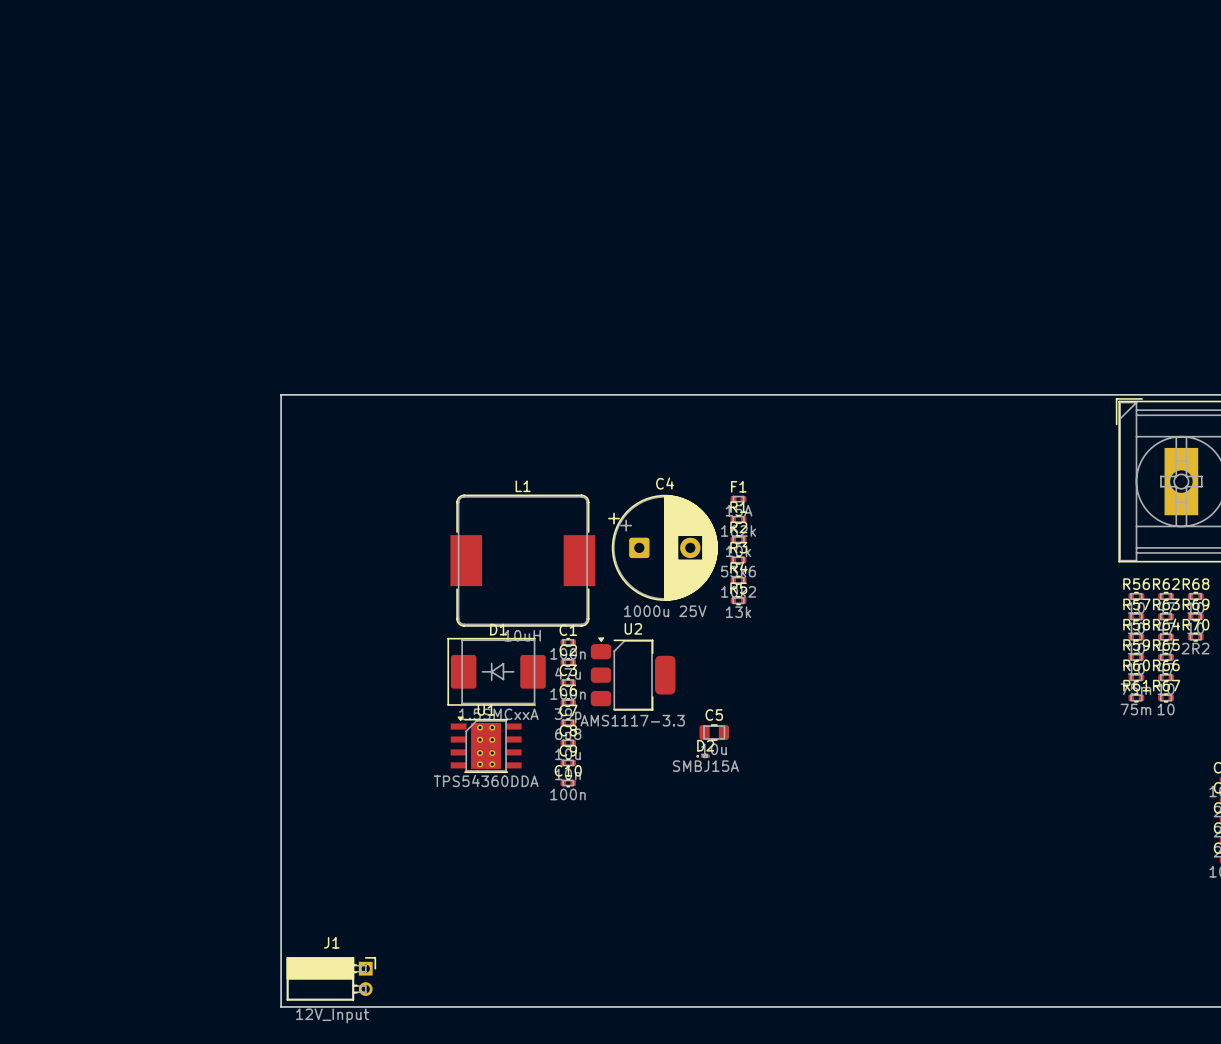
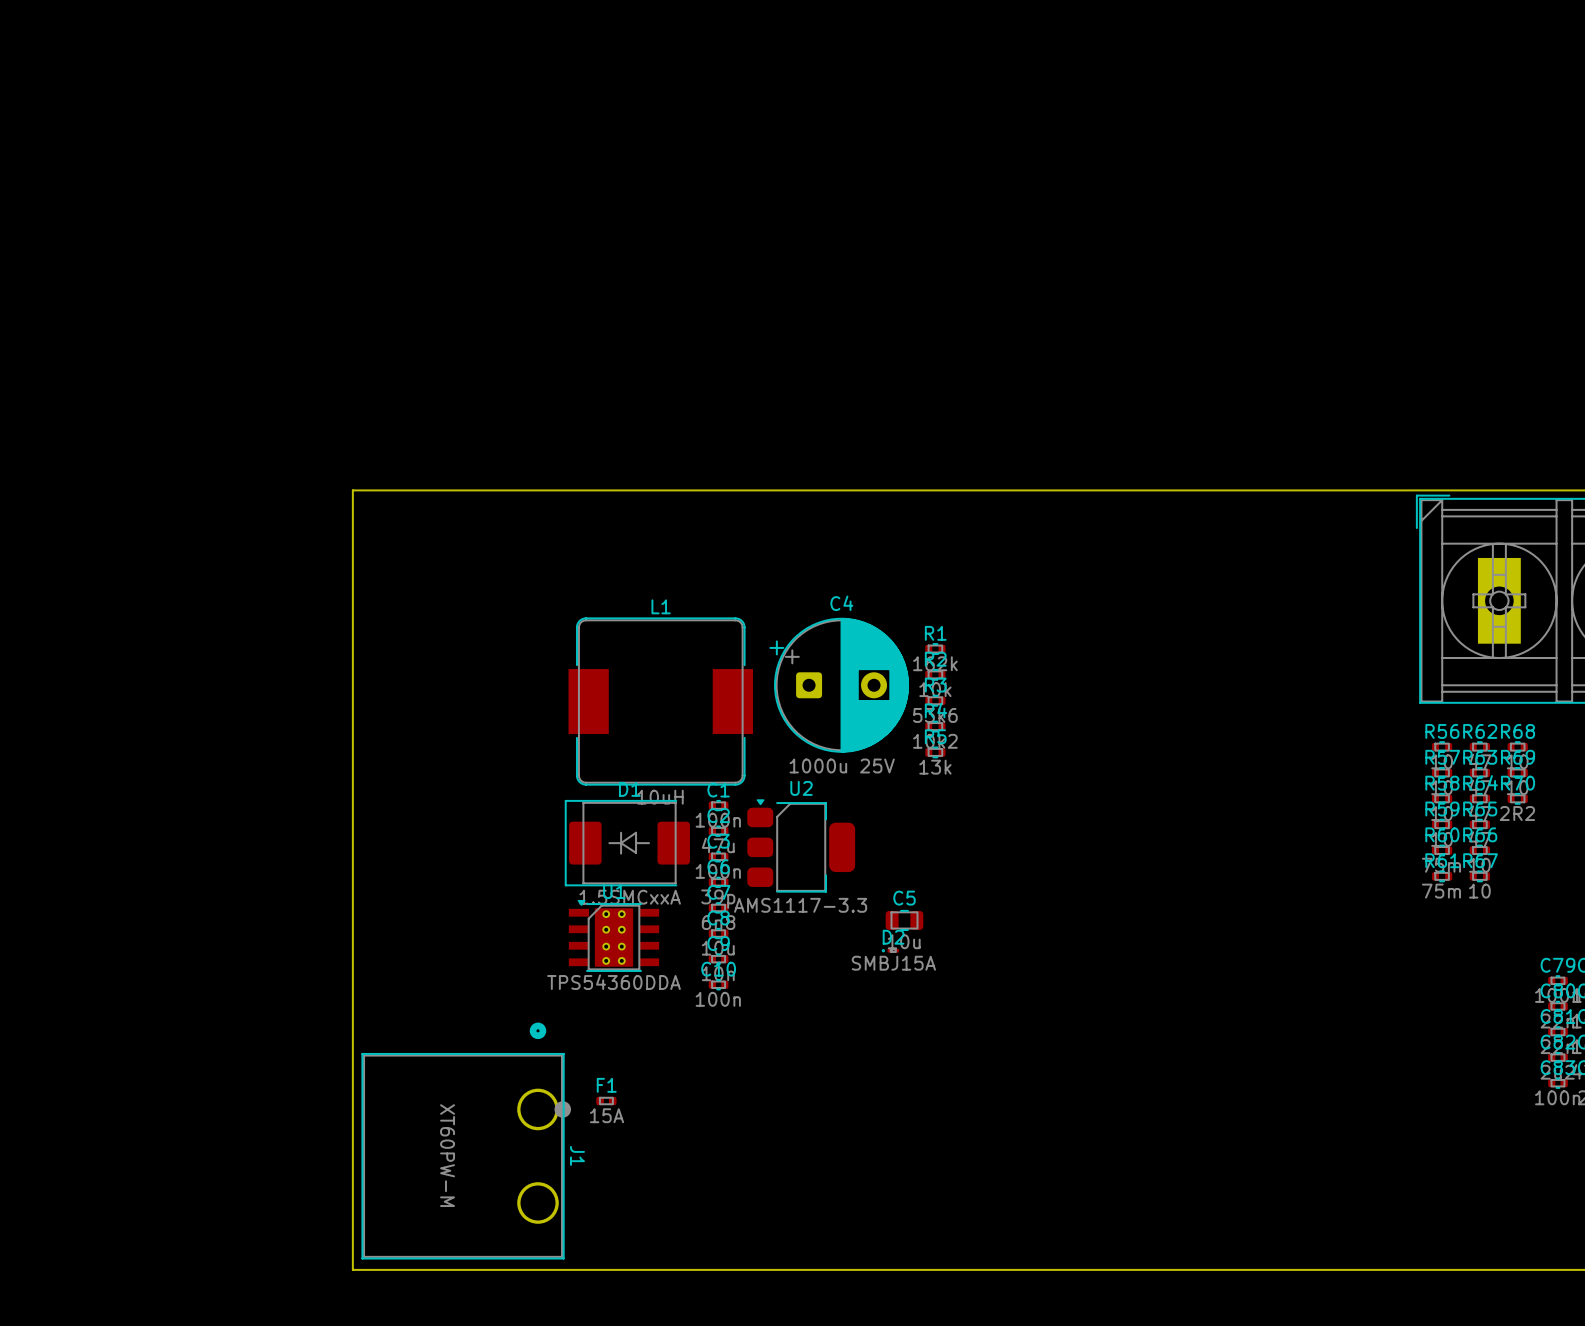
F1 position: (738, 499) -> (606, 1101)
J1 name position: J1 (331, 942) -> J1 (577, 1155)
J1 footprint: [286, 957, 376, 1001] -> [361, 1022, 572, 1260]
J1 value: 12V_Input (332, 1015) -> XT60PW-M (447, 1155)

